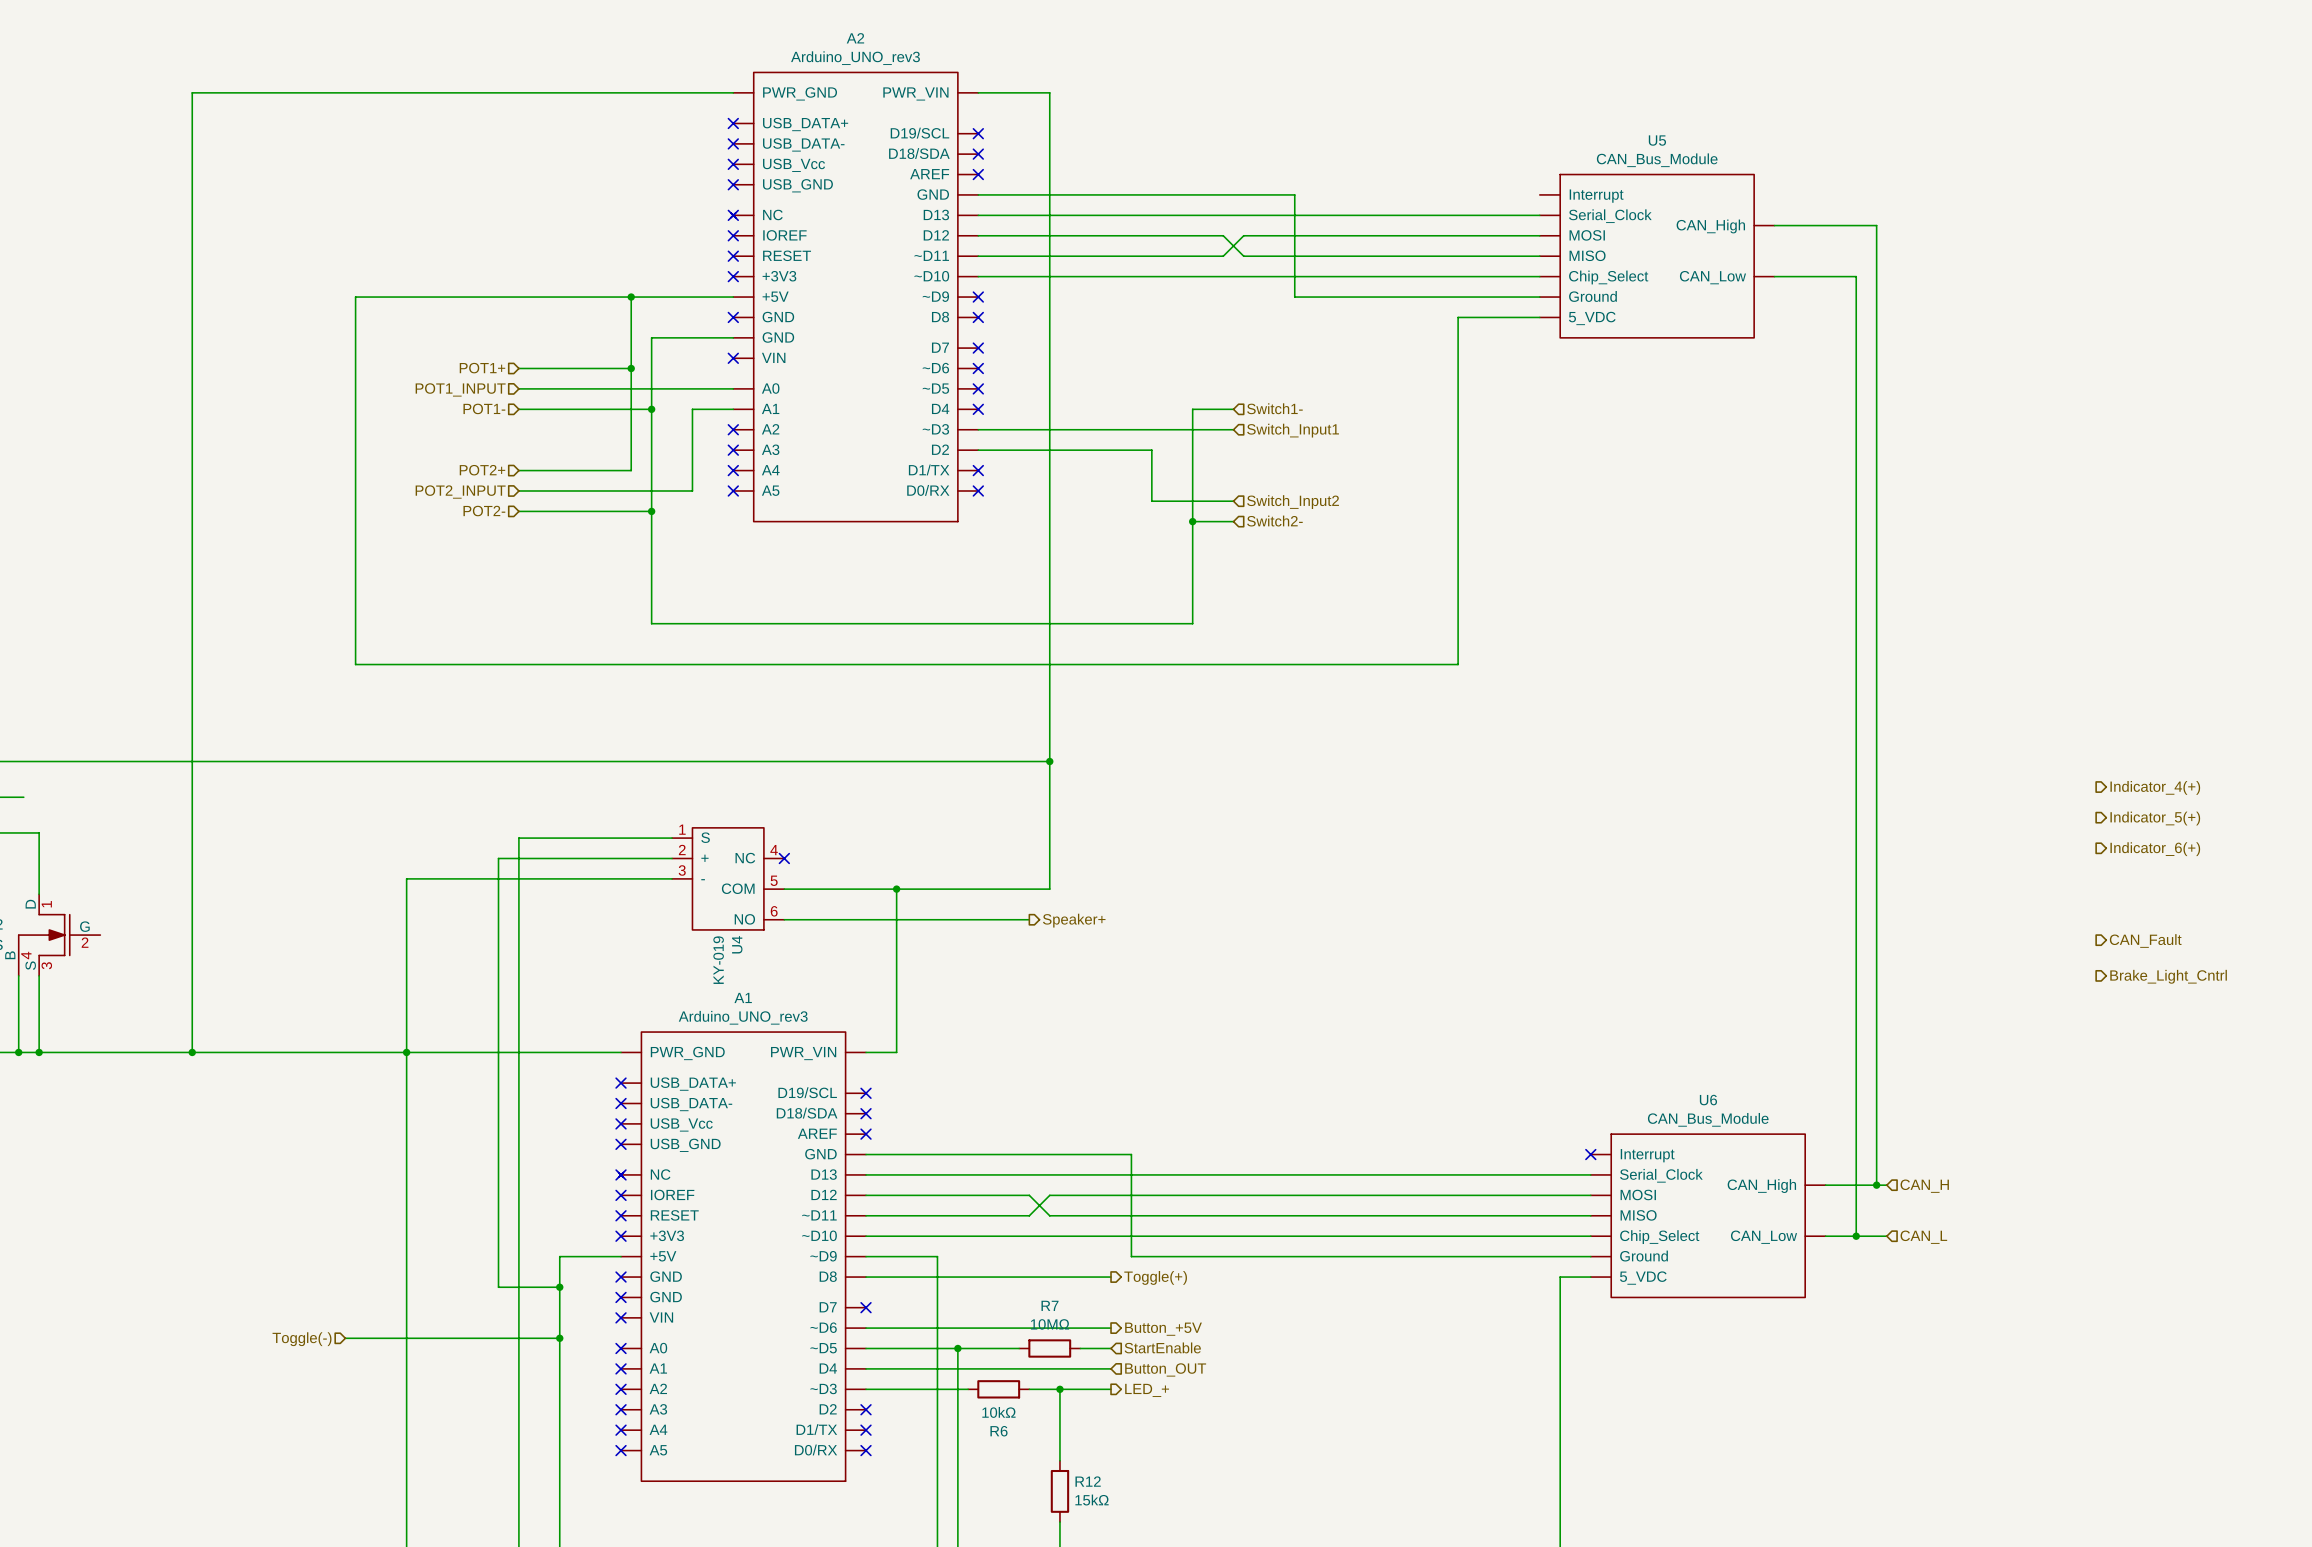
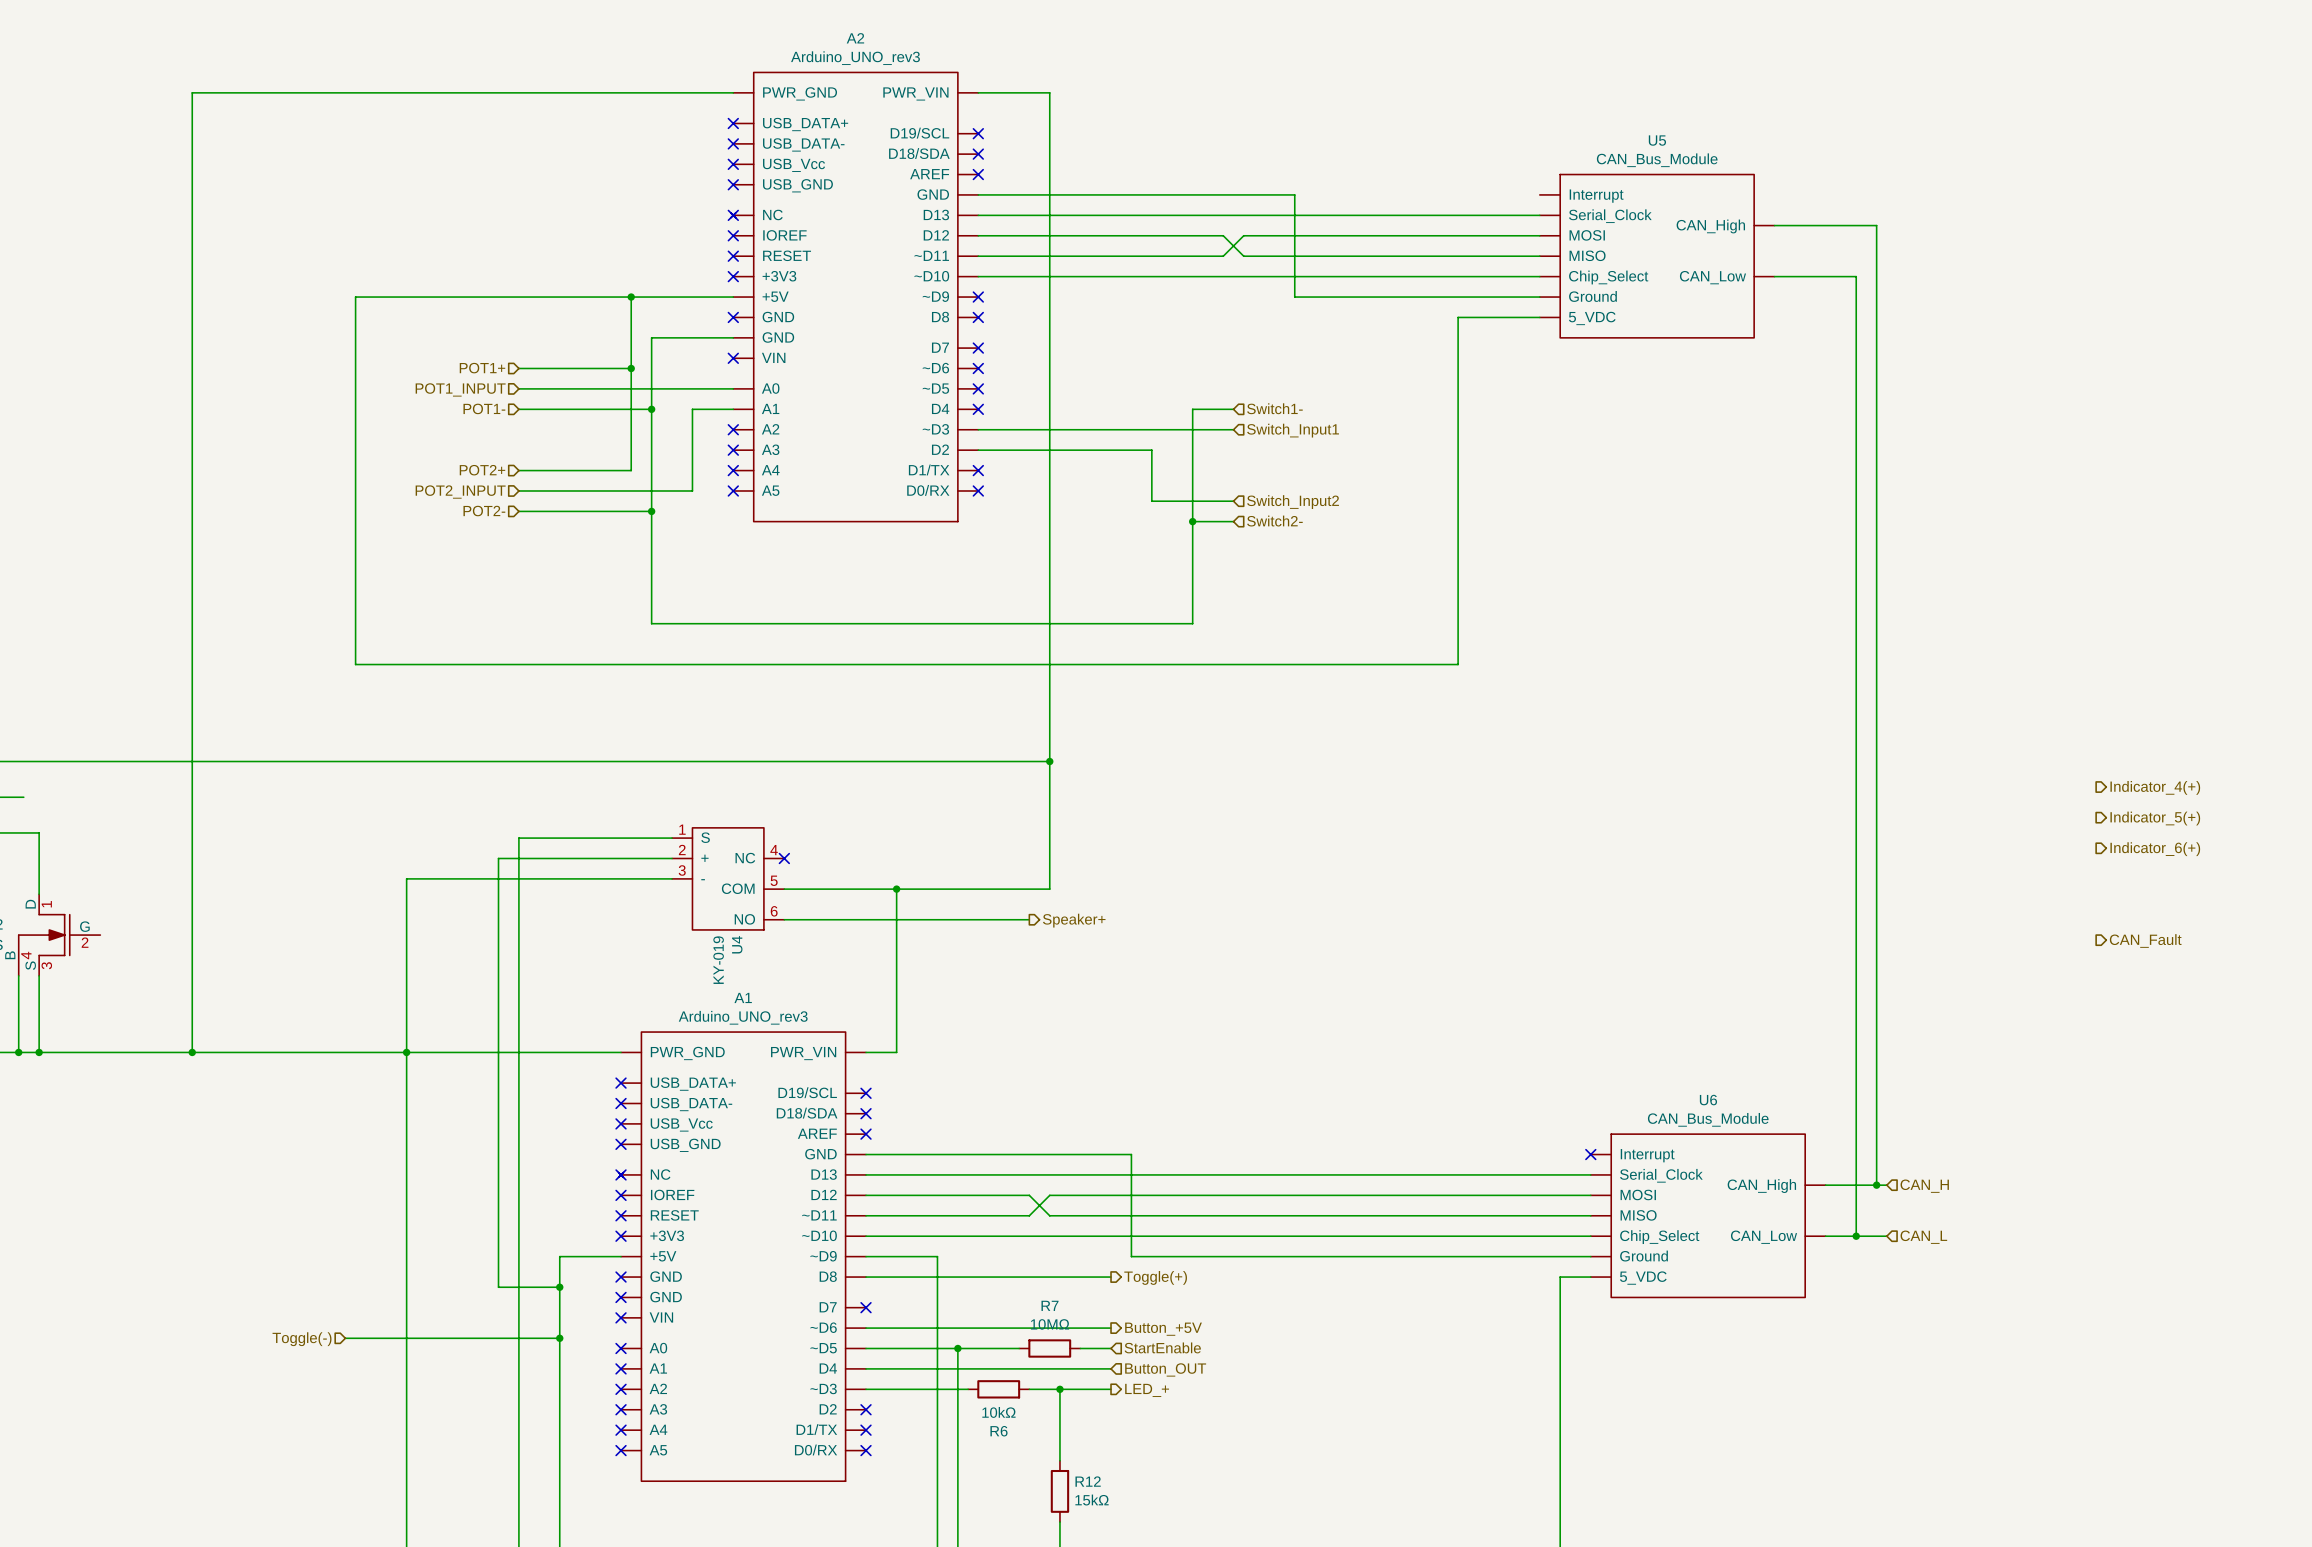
hierarchical label: Brake_Light_Cntrl (2168, 976) -> none

